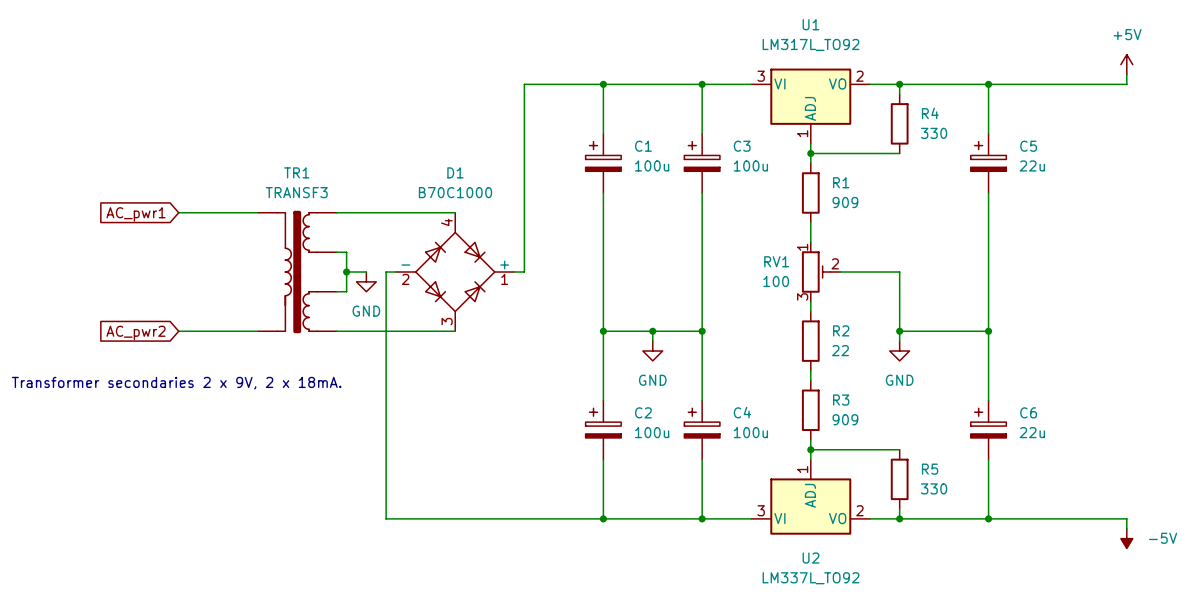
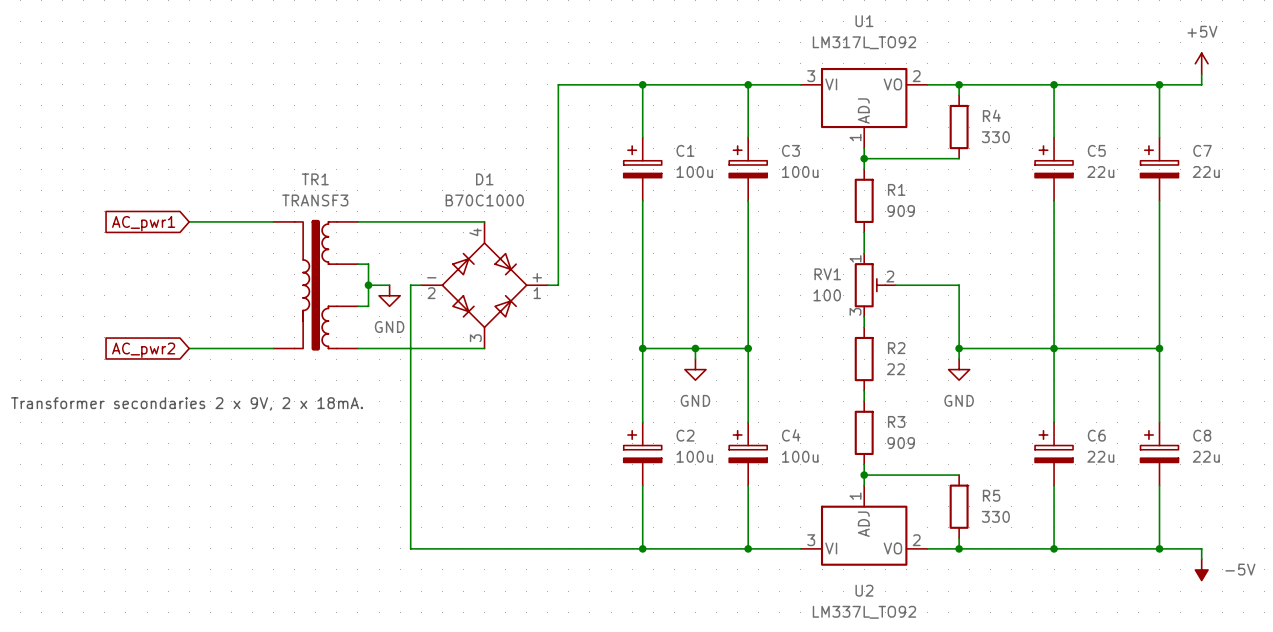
wire: none -> (1159, 84) (1159, 137)
junction: none -> (1159, 84)
C7: none -> 22u (1159, 169)
wire: none -> (1159, 200) (1159, 422)
wire: none -> (1054, 348) (1159, 348)
junction: none -> (1159, 348)
C8: none -> 22u (1159, 453)
wire: none -> (1159, 485) (1159, 548)
junction: none -> (1159, 548)

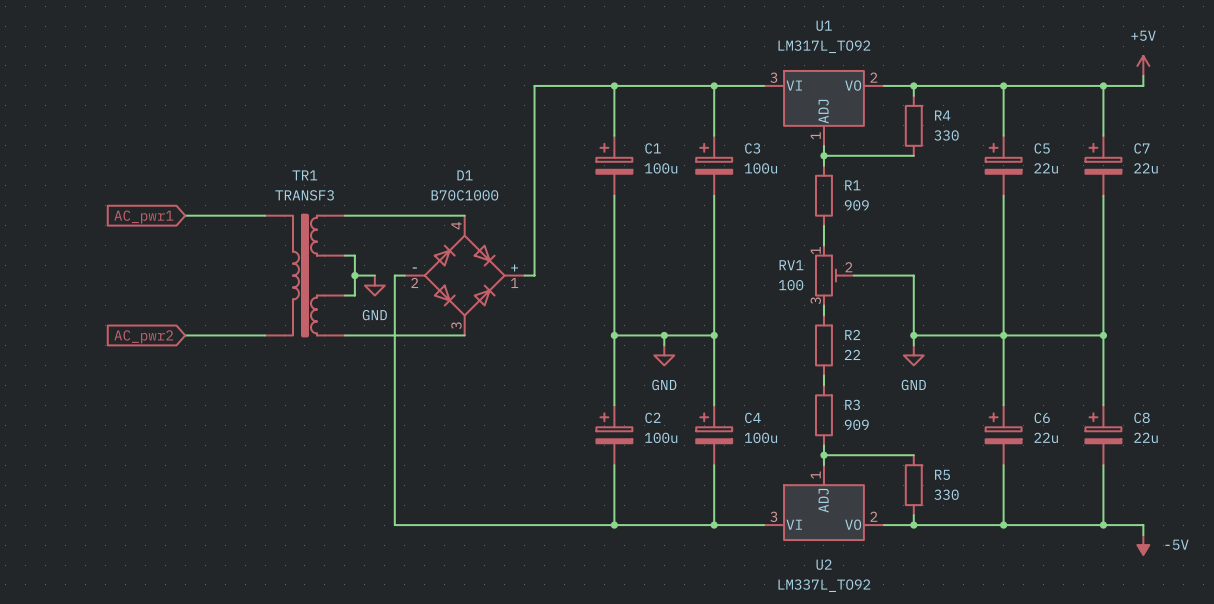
text: Transformer secondaries 2 x 9V, 2 x 18mA. (187, 403) -> none

